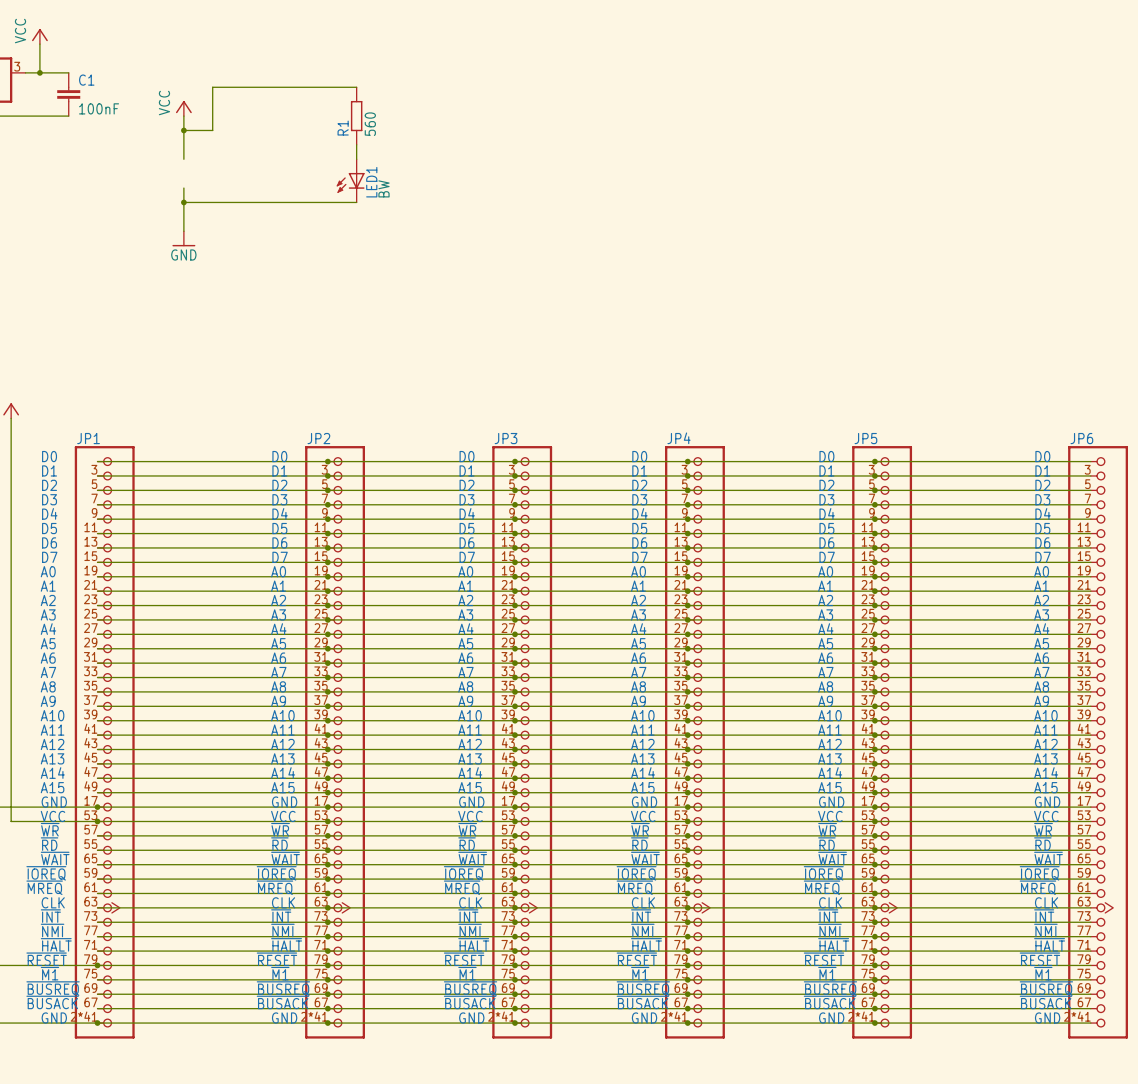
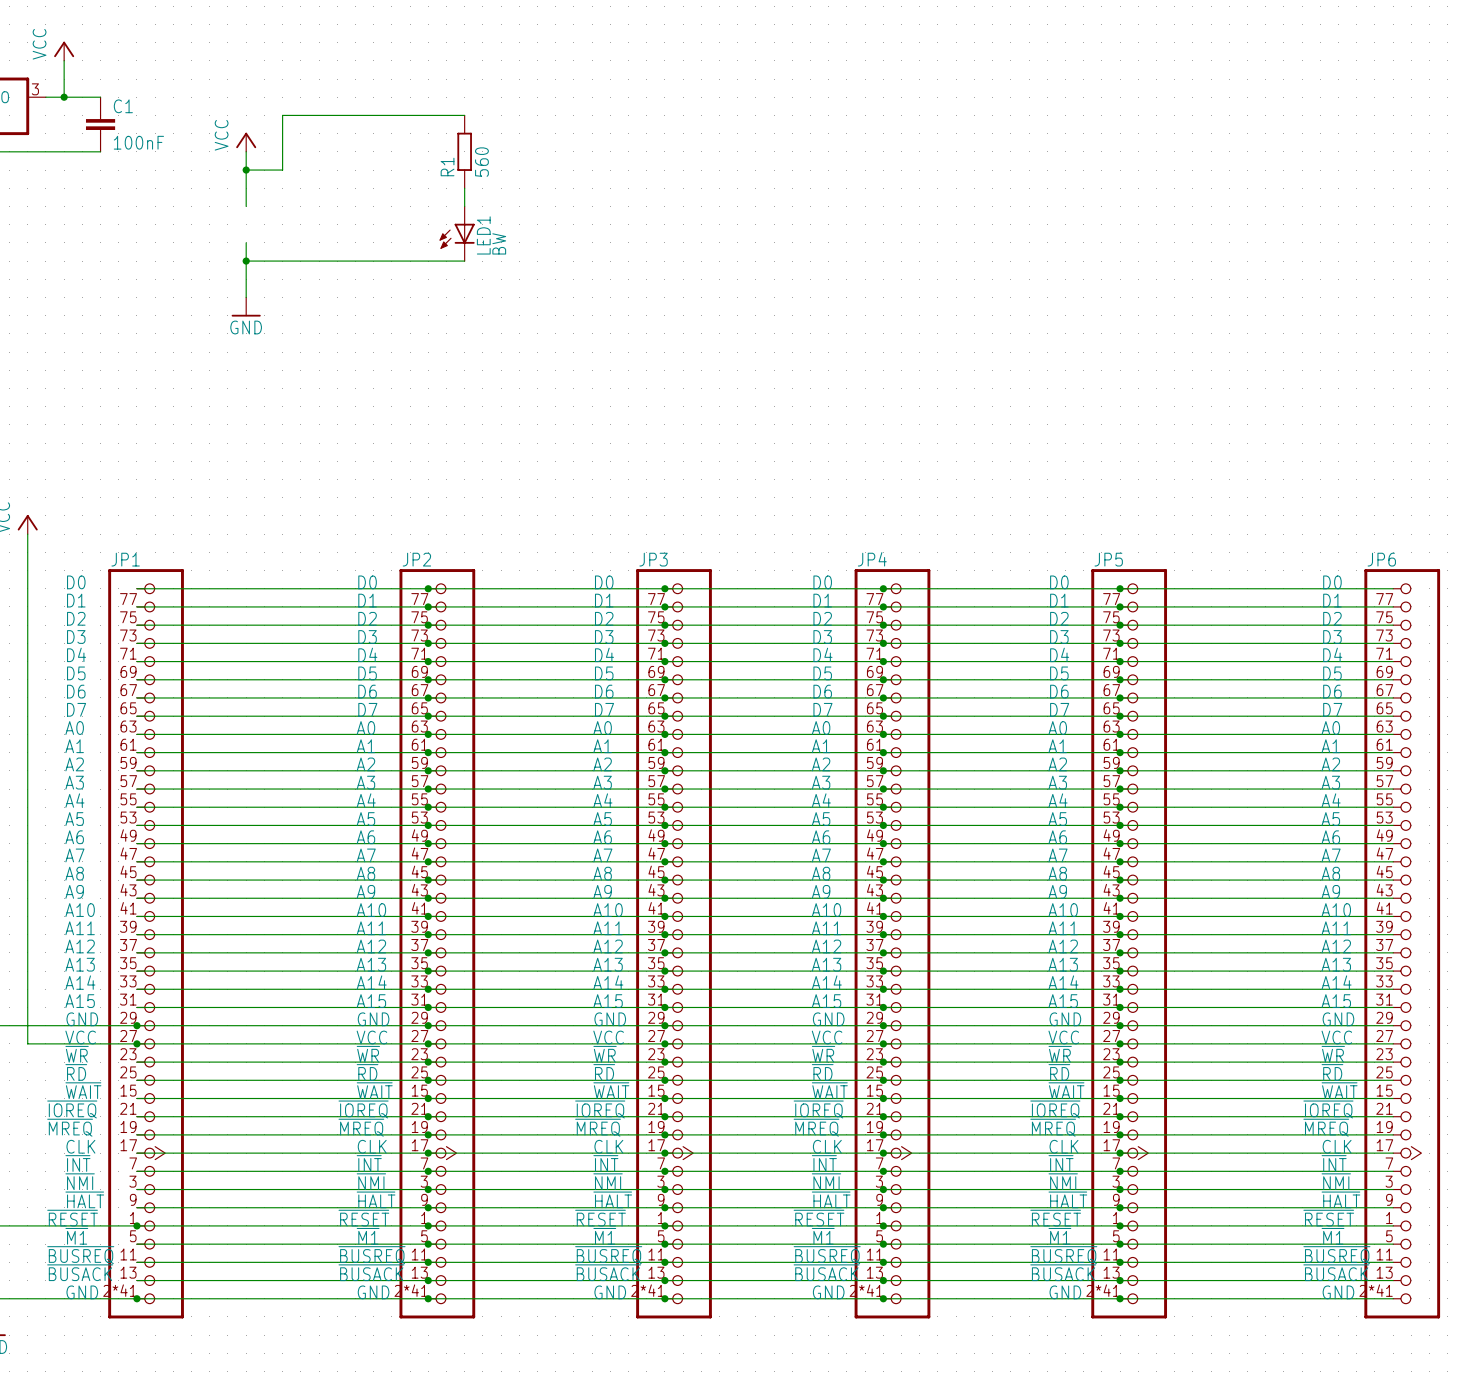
JP1 symbol: [74, 446, 135, 1039] -> [108, 569, 184, 1319]
JP2 symbol: [305, 446, 366, 1039] -> [399, 569, 476, 1319]
JP3 symbol: [492, 446, 553, 1039] -> [636, 569, 712, 1319]
JP4 symbol: [665, 446, 725, 1039] -> [854, 569, 931, 1319]
JP5 symbol: [852, 446, 913, 1039] -> [1091, 569, 1168, 1319]
JP6 symbol: [1068, 446, 1128, 1039] -> [1364, 569, 1441, 1319]

